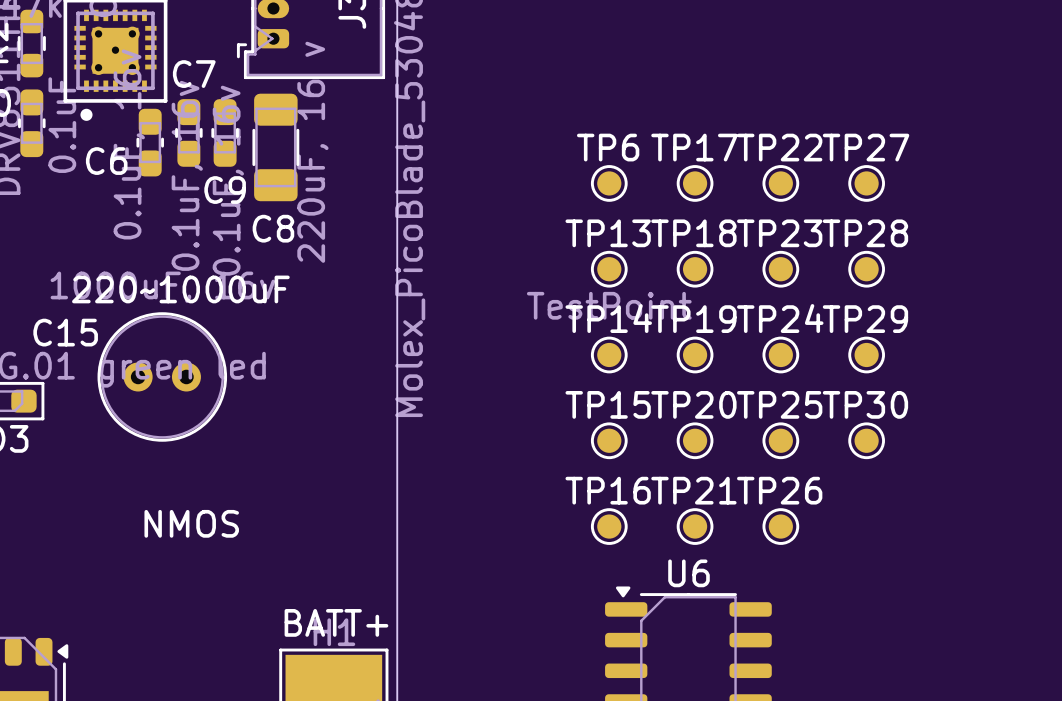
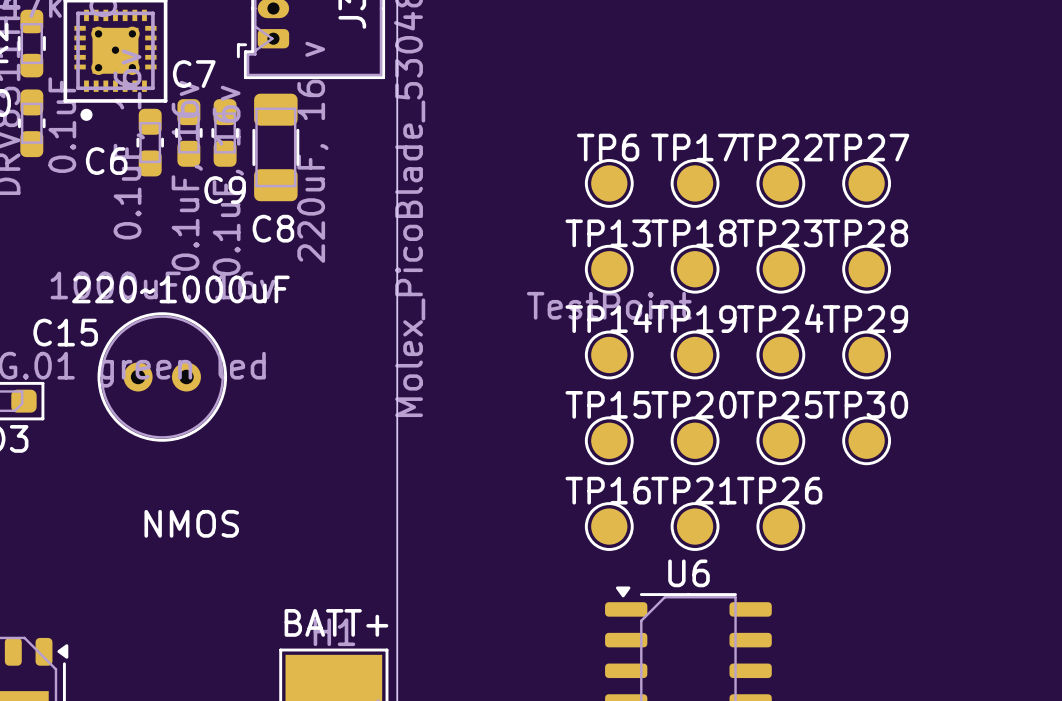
TP6 footprint: [590, 165, 628, 202] -> [584, 159, 634, 208]
TP17 footprint: [676, 165, 714, 202] -> [670, 159, 720, 208]
TP22 footprint: [762, 165, 800, 202] -> [756, 159, 806, 208]
TP27 footprint: [848, 165, 885, 202] -> [842, 159, 892, 208]
TP13 footprint: [590, 250, 628, 288] -> [584, 244, 634, 294]
TP18 footprint: [676, 250, 714, 288] -> [670, 244, 720, 294]
TP23 footprint: [762, 250, 800, 288] -> [756, 244, 806, 294]
TP28 footprint: [848, 250, 885, 288] -> [842, 244, 892, 294]
TP14 footprint: [590, 336, 628, 374] -> [584, 330, 634, 380]
TP19 footprint: [676, 336, 714, 374] -> [670, 330, 720, 380]
TP24 footprint: [762, 336, 800, 374] -> [756, 330, 806, 380]
TP29 footprint: [848, 336, 885, 374] -> [842, 330, 892, 380]
TP15 footprint: [590, 422, 628, 460] -> [584, 416, 634, 466]
TP20 footprint: [676, 422, 714, 460] -> [670, 416, 720, 466]
TP25 footprint: [762, 422, 800, 460] -> [756, 416, 806, 466]
TP30 footprint: [848, 422, 885, 460] -> [842, 416, 892, 466]
TP16 footprint: [590, 508, 628, 545] -> [584, 502, 634, 551]
TP21 footprint: [676, 508, 714, 545] -> [670, 502, 720, 551]
TP26 footprint: [762, 508, 800, 545] -> [756, 502, 806, 551]

